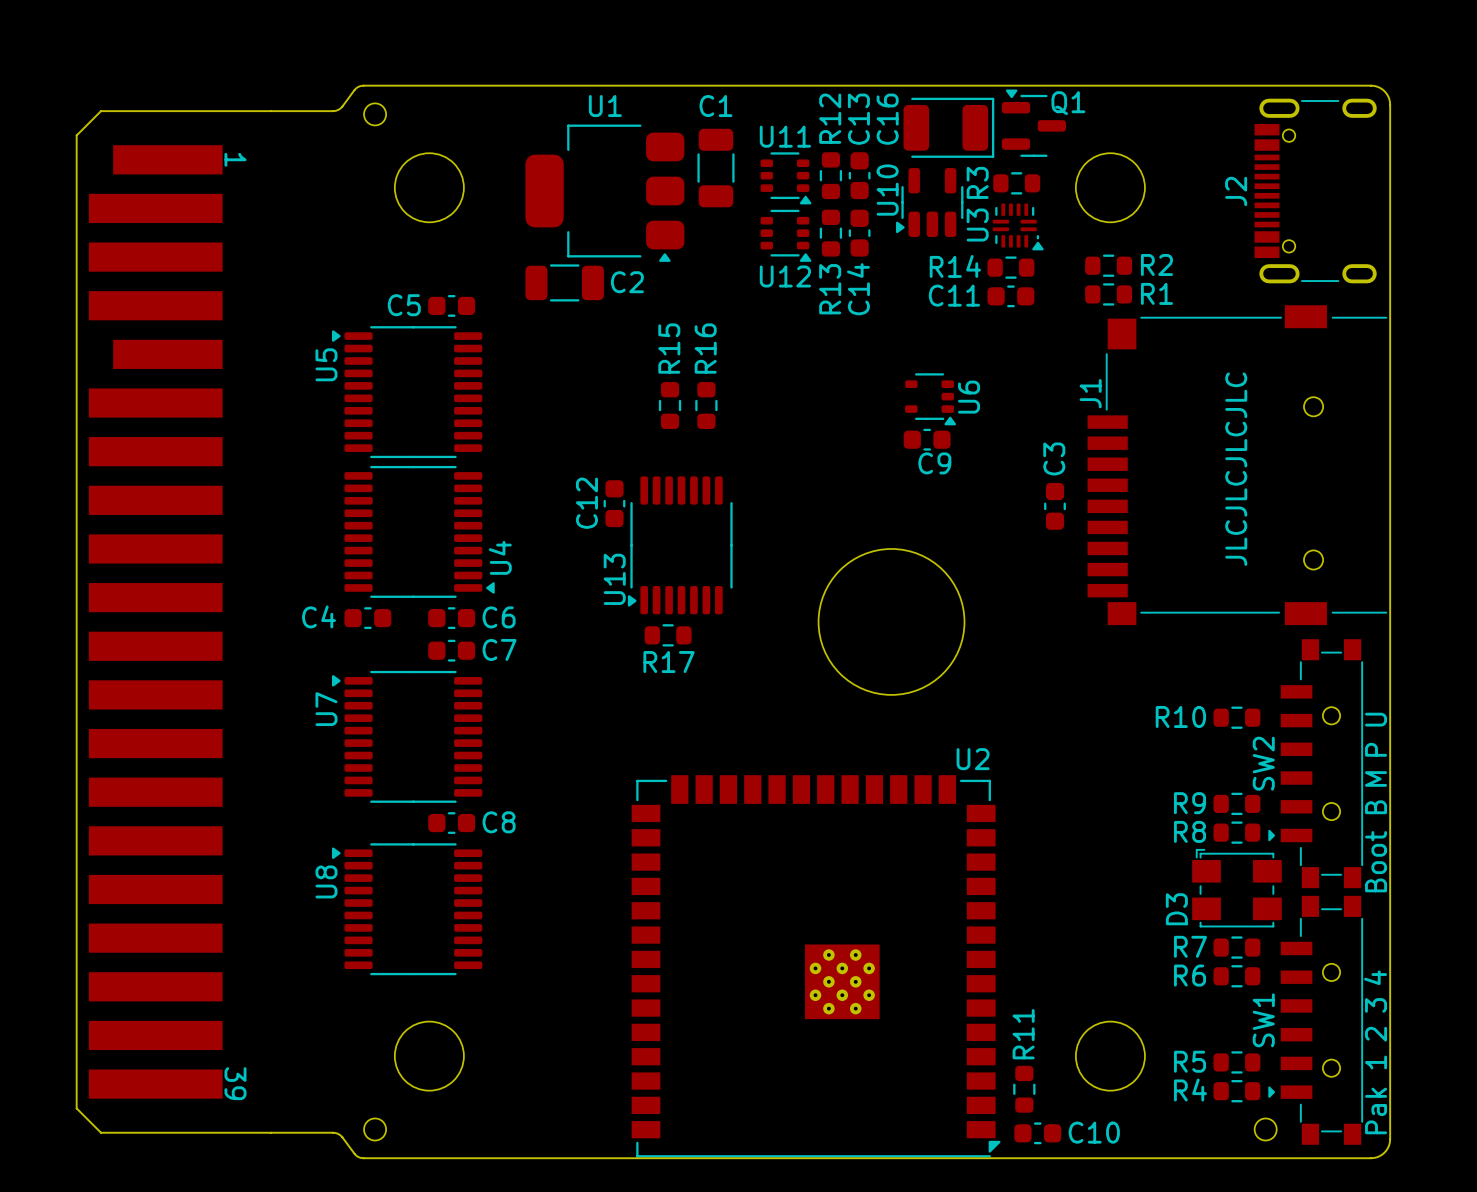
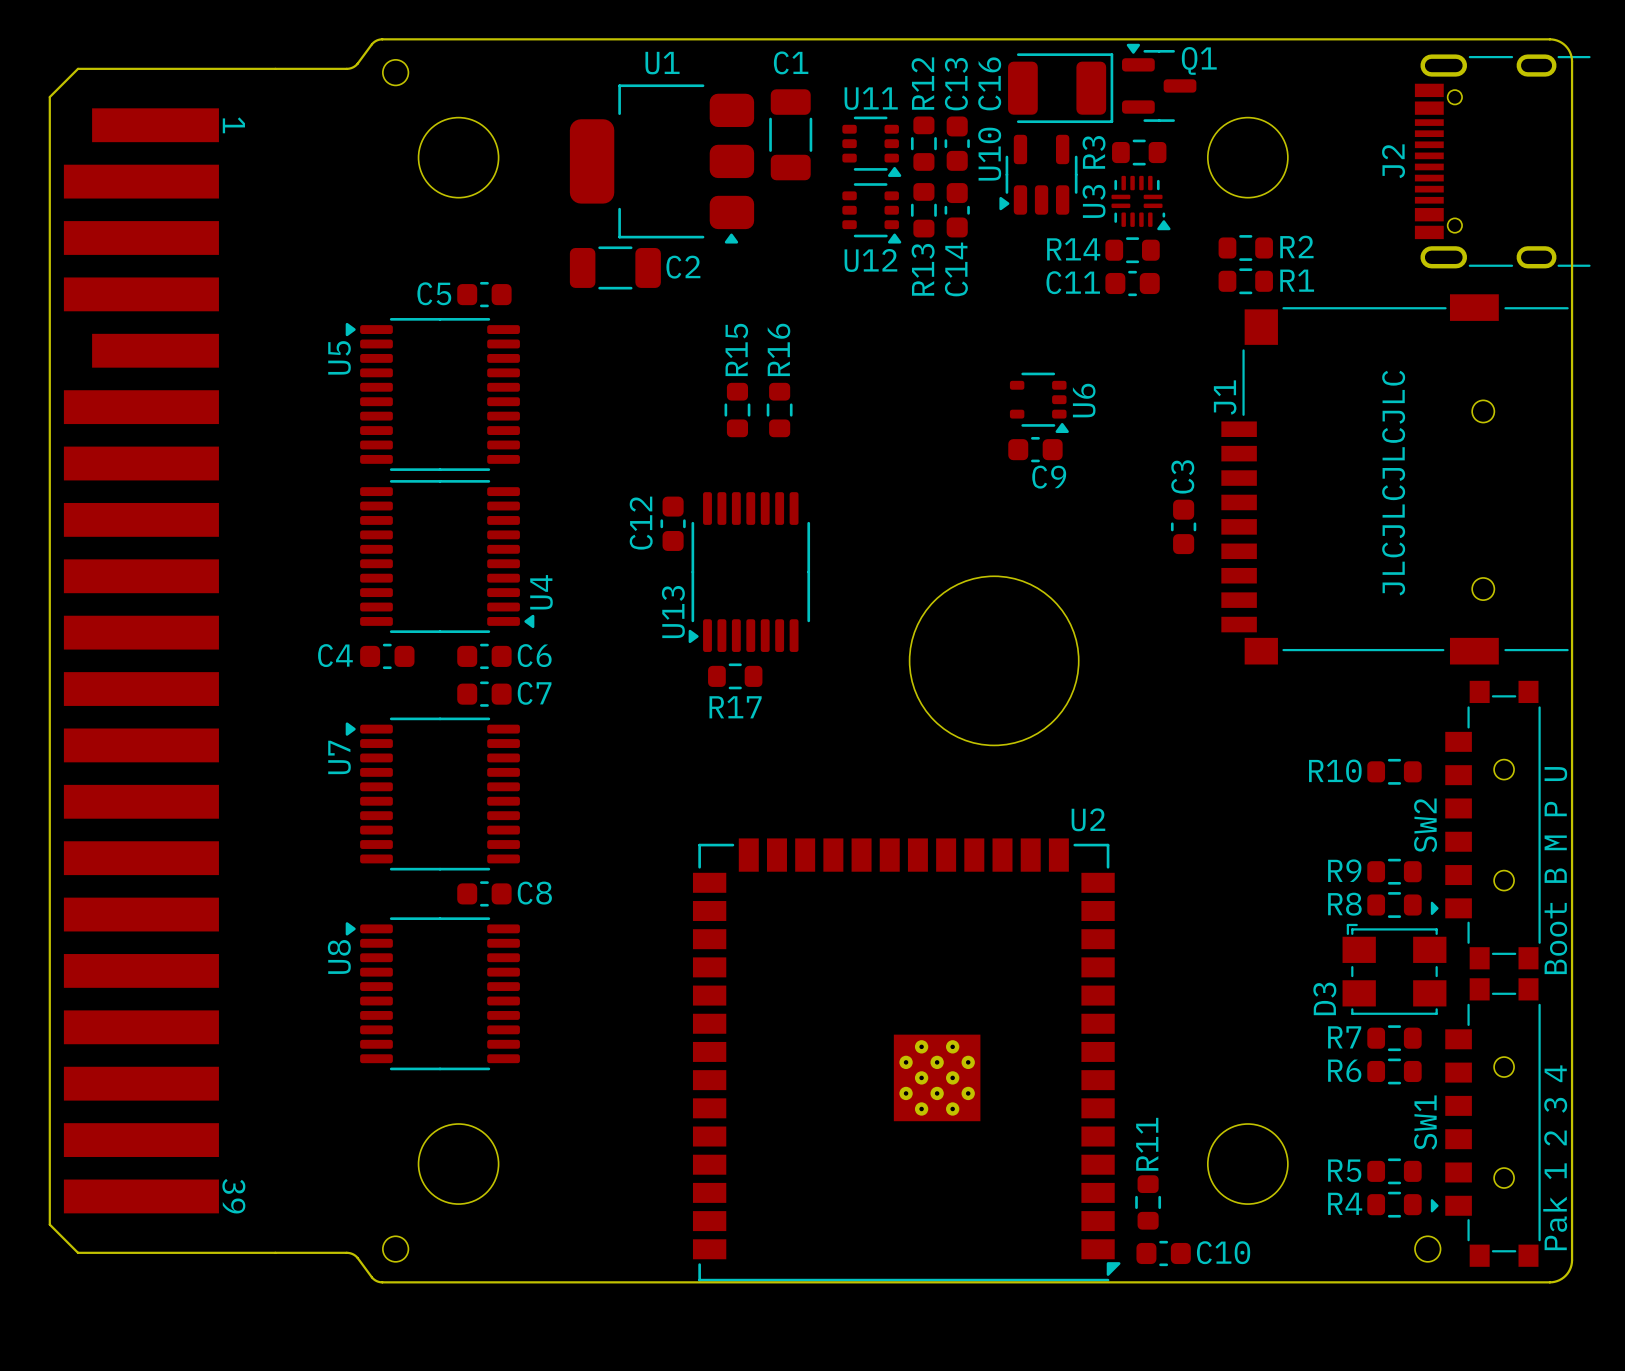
J2 footprint: [1254, 98, 1377, 284] -> [1414, 54, 1591, 269]
J1 footprint: [1087, 305, 1388, 626] -> [1221, 294, 1569, 665]
SW2 footprint: [1268, 639, 1364, 889] -> [1430, 680, 1541, 970]
SW1 footprint: [1268, 895, 1364, 1145] -> [1430, 978, 1541, 1267]

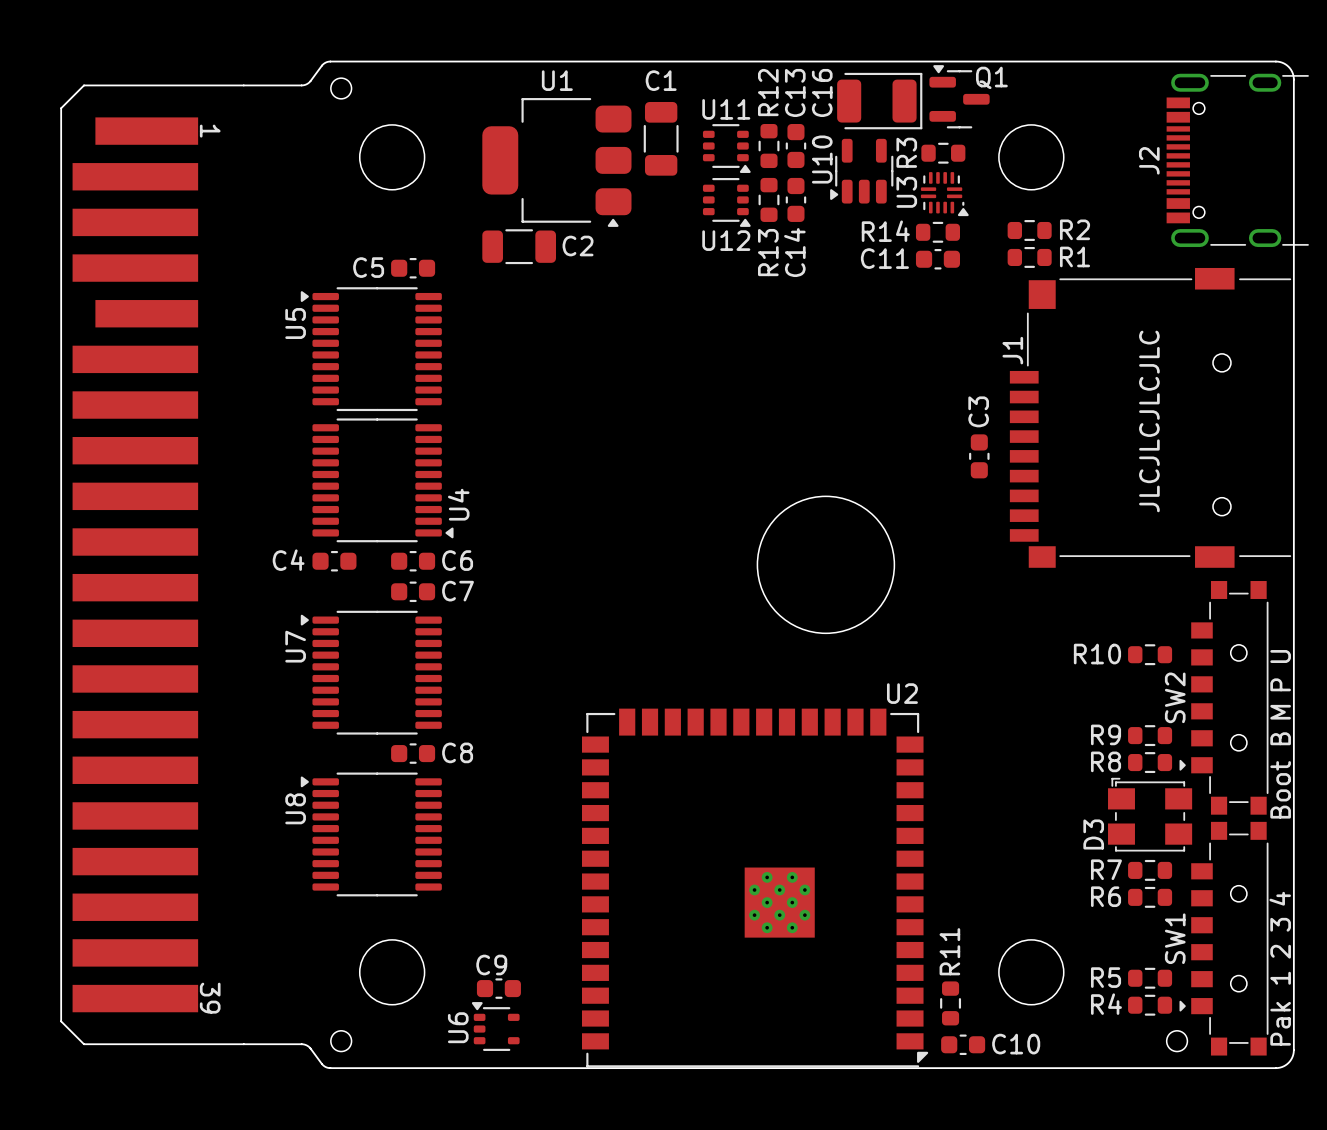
U6 rotation: 0° (1039, 402) -> 180° (495, 1026)
U6 position: (1039, 402) -> (495, 1026)
R15: (737, 410) -> none
R16: (779, 410) -> none
C9 position: (1035, 449) -> (498, 988)
C9 name position: C9 (1049, 477) -> C9 (491, 965)
C12: (673, 523) -> none
U13: (749, 572) -> none
R17: (735, 676) -> none

